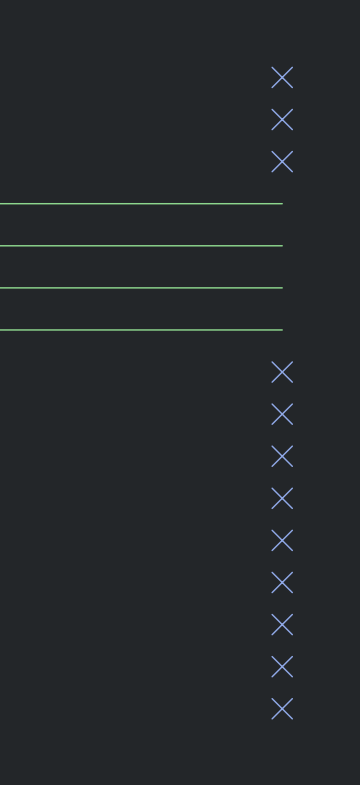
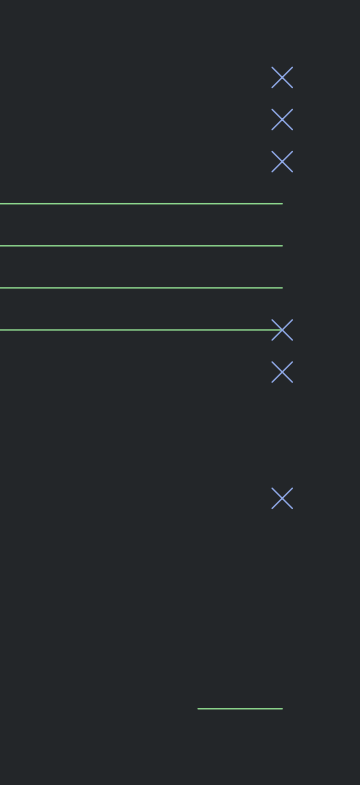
no-connect mark: none -> (282, 329)
no-connect mark: (282, 414) -> none
no-connect mark: (282, 456) -> none
no-connect mark: (282, 540) -> none
no-connect mark: (282, 582) -> none
no-connect mark: (282, 624) -> none
no-connect mark: (282, 666) -> none
wire: none -> (198, 708) (282, 708)
no-connect mark: (282, 708) -> none

